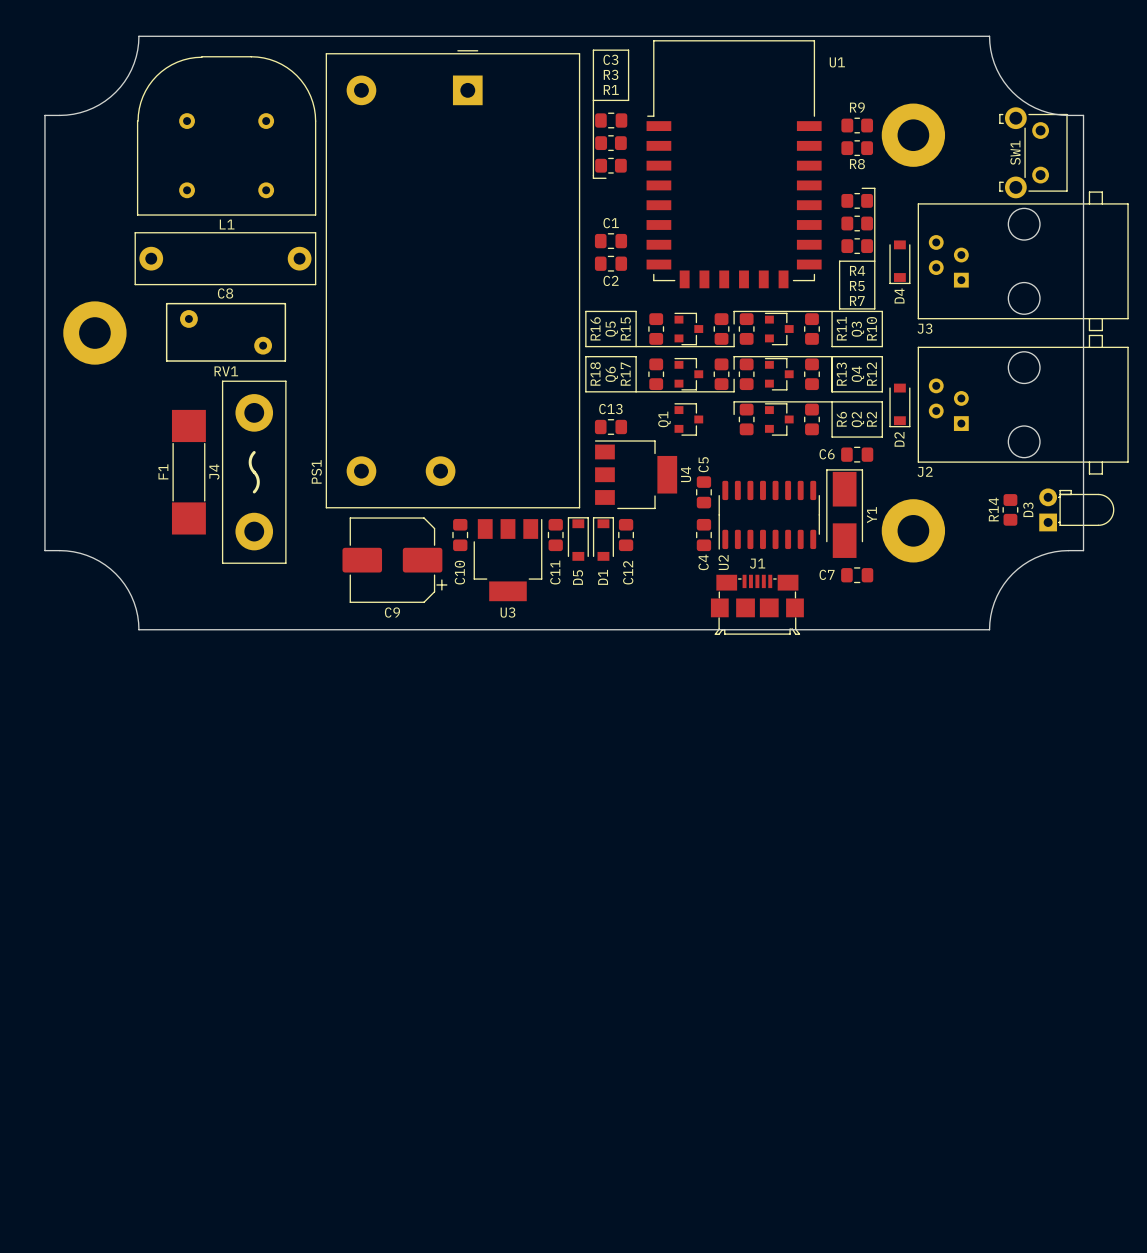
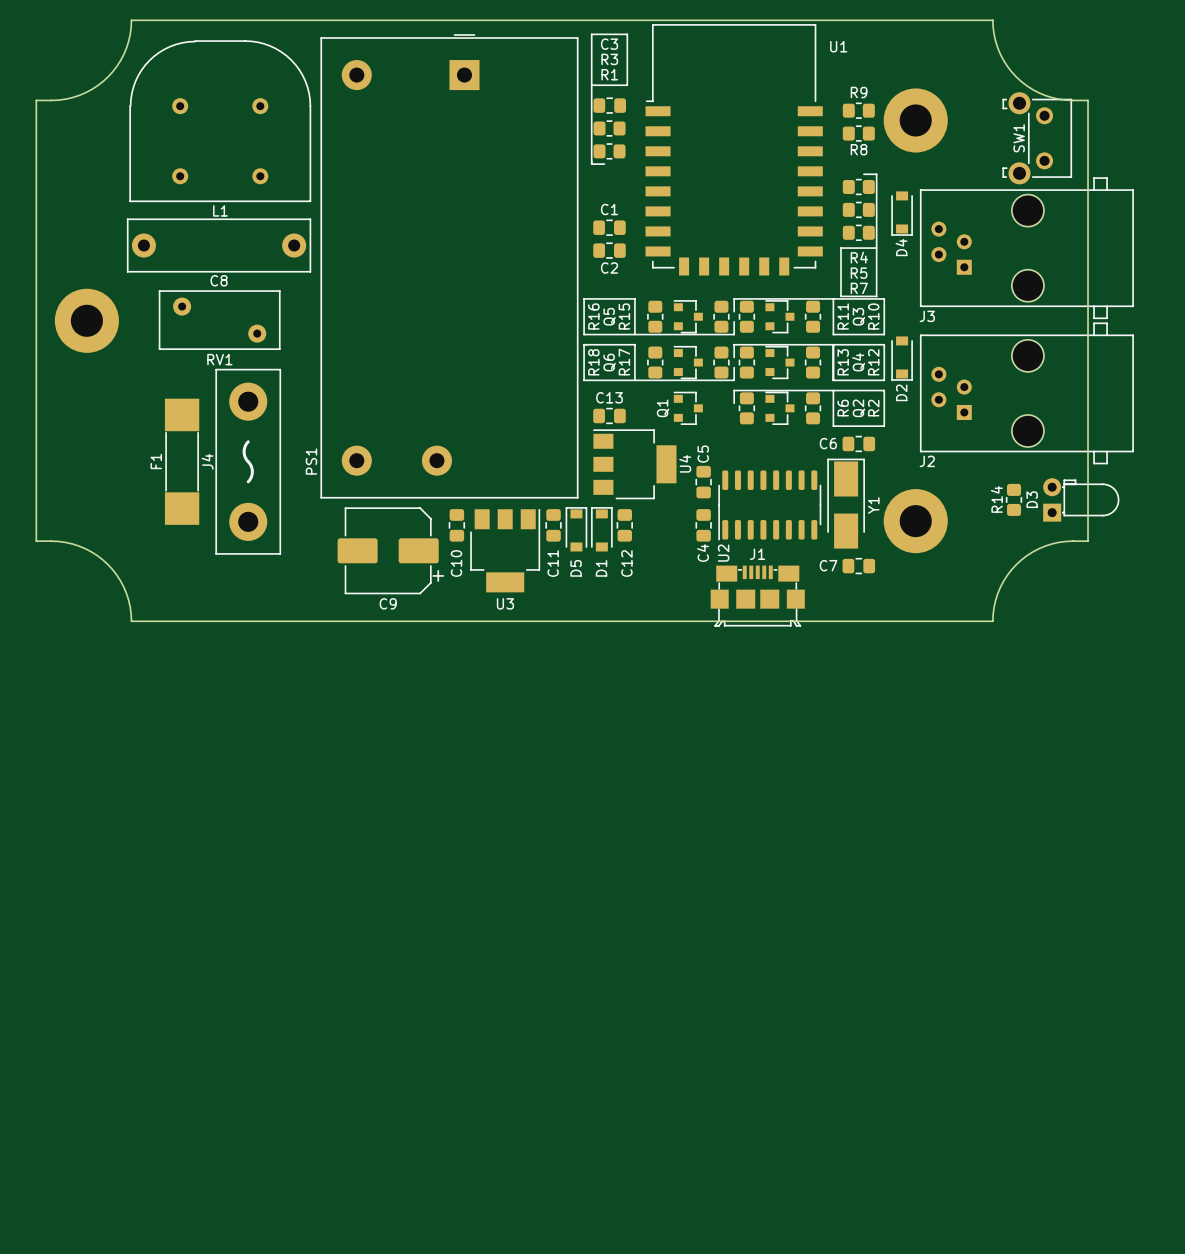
D4 position: (899, 262) -> (902, 213)
D2 position: (899, 405) -> (902, 358)

